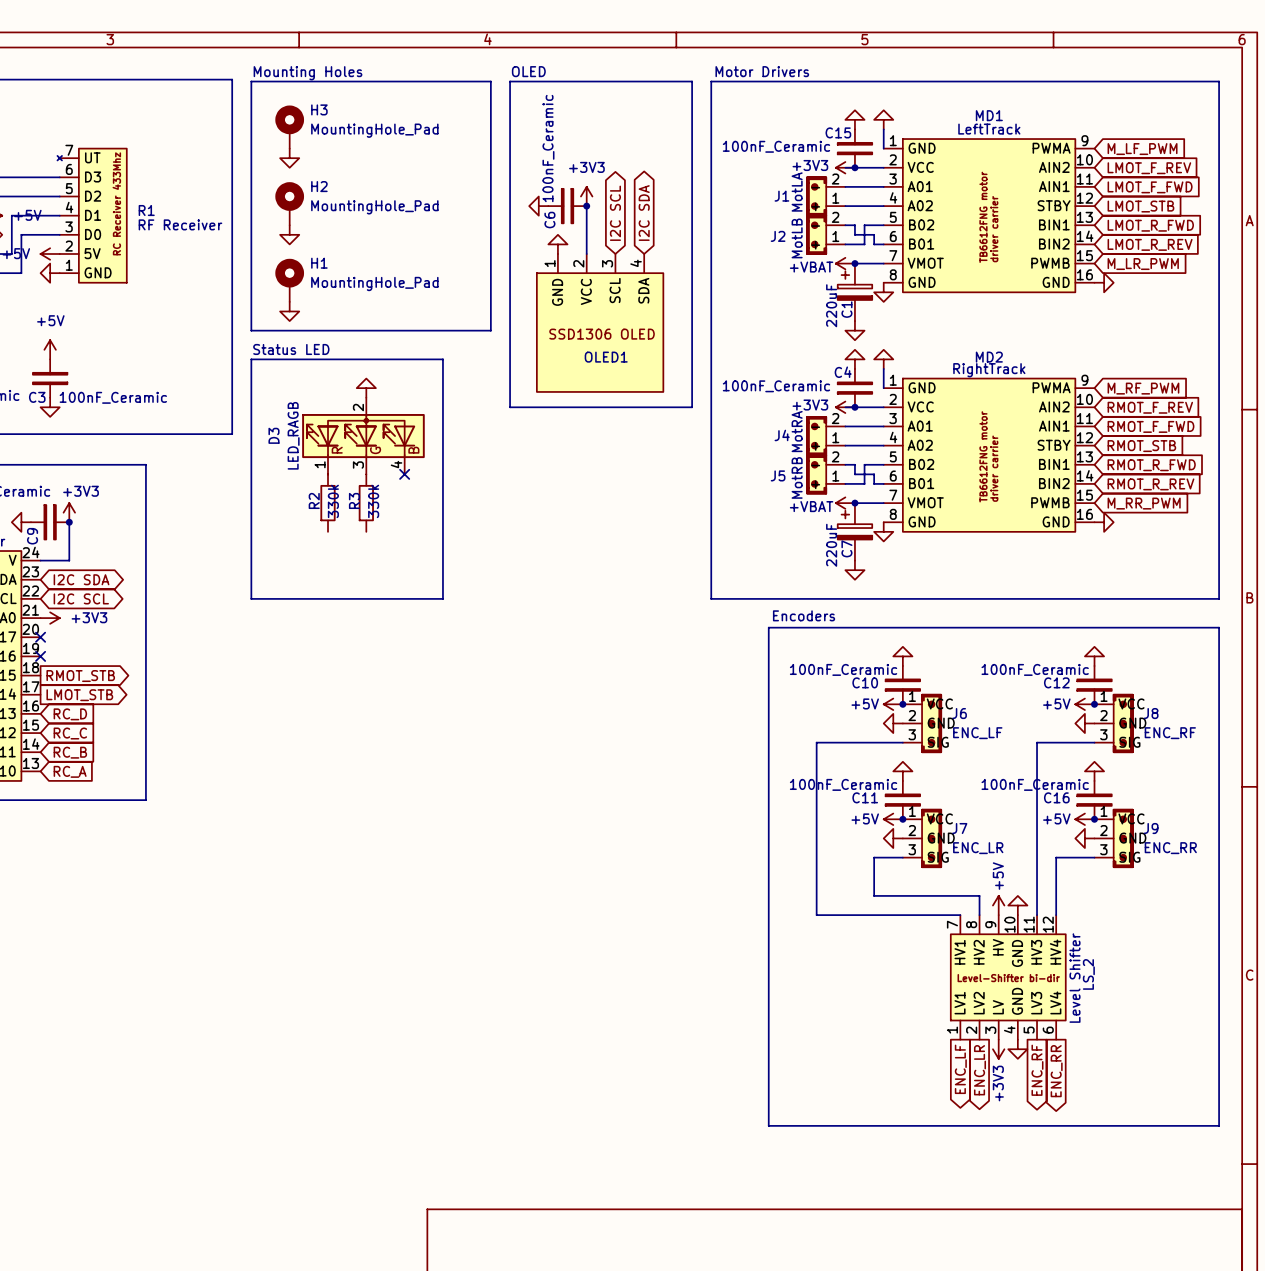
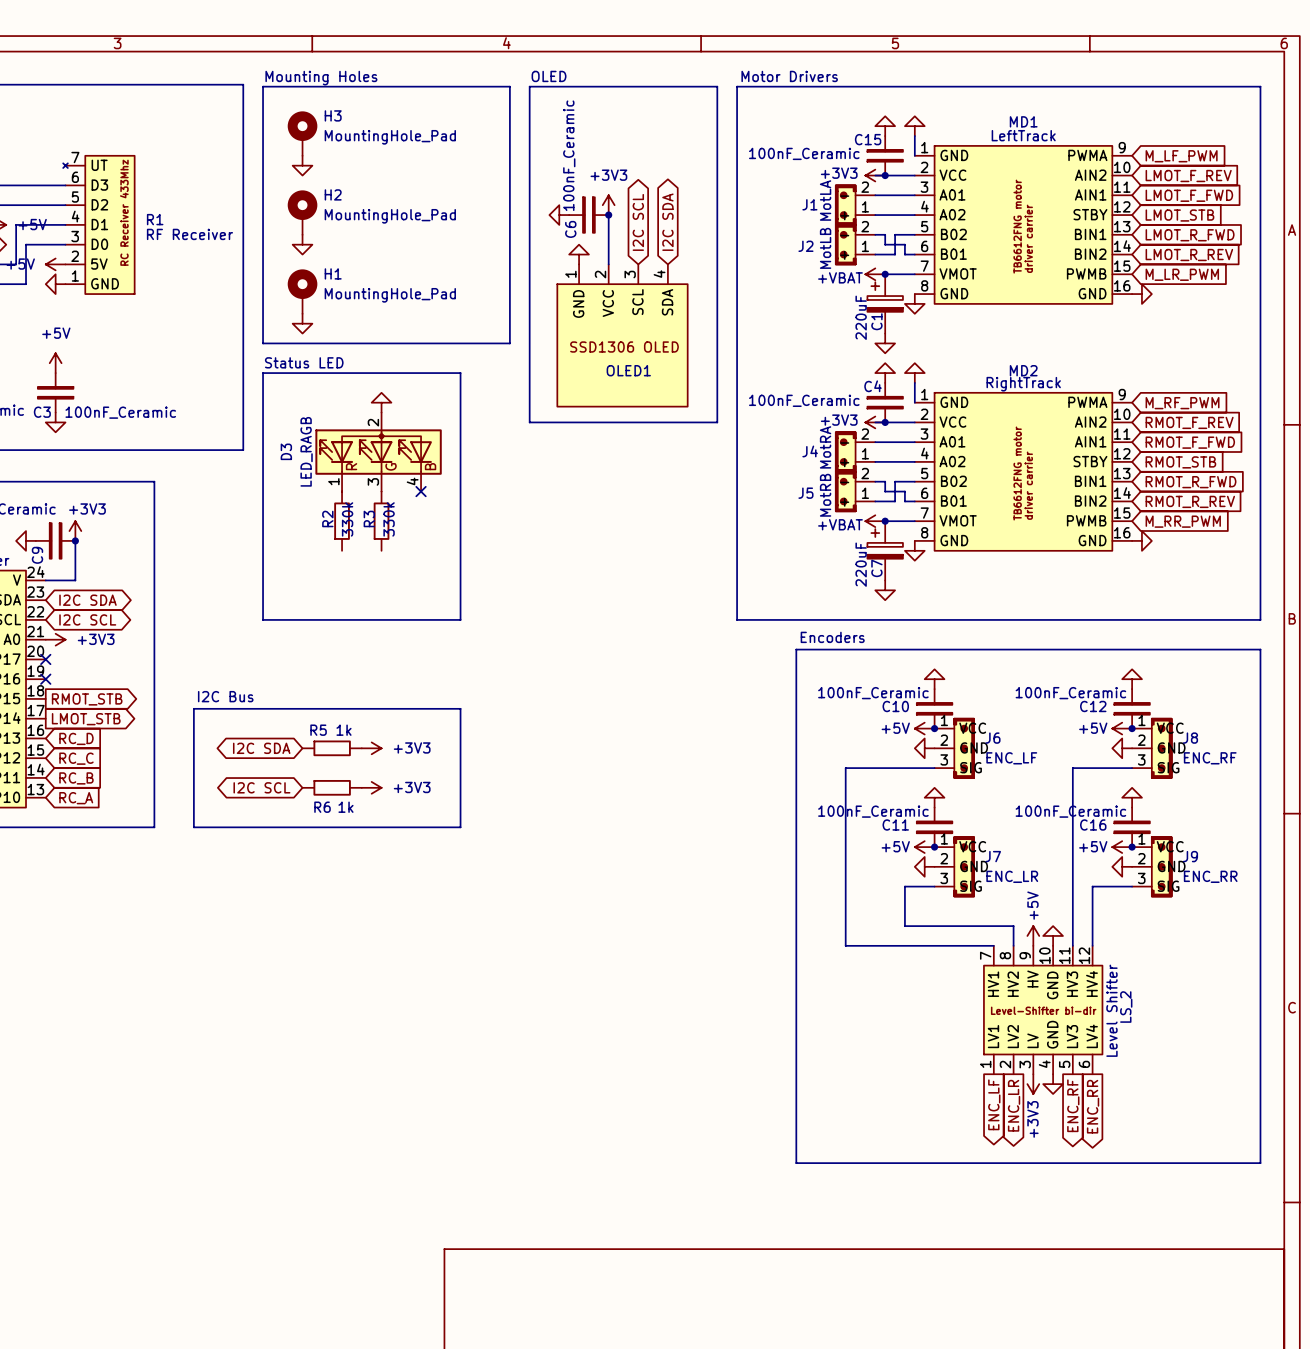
text: none -> I2C Bus (225, 696)
line: none -> (193, 708) (460, 708) (460, 827) (193, 827) (193, 708)
global label: none -> I2C SDA (261, 748)
R5: none -> 1k (332, 748)
power symbol: none -> +3V3 (371, 748)
global label: none -> I2C SCL (261, 787)
R6: none -> 1k (332, 787)
power symbol: none -> +3V3 (371, 787)

